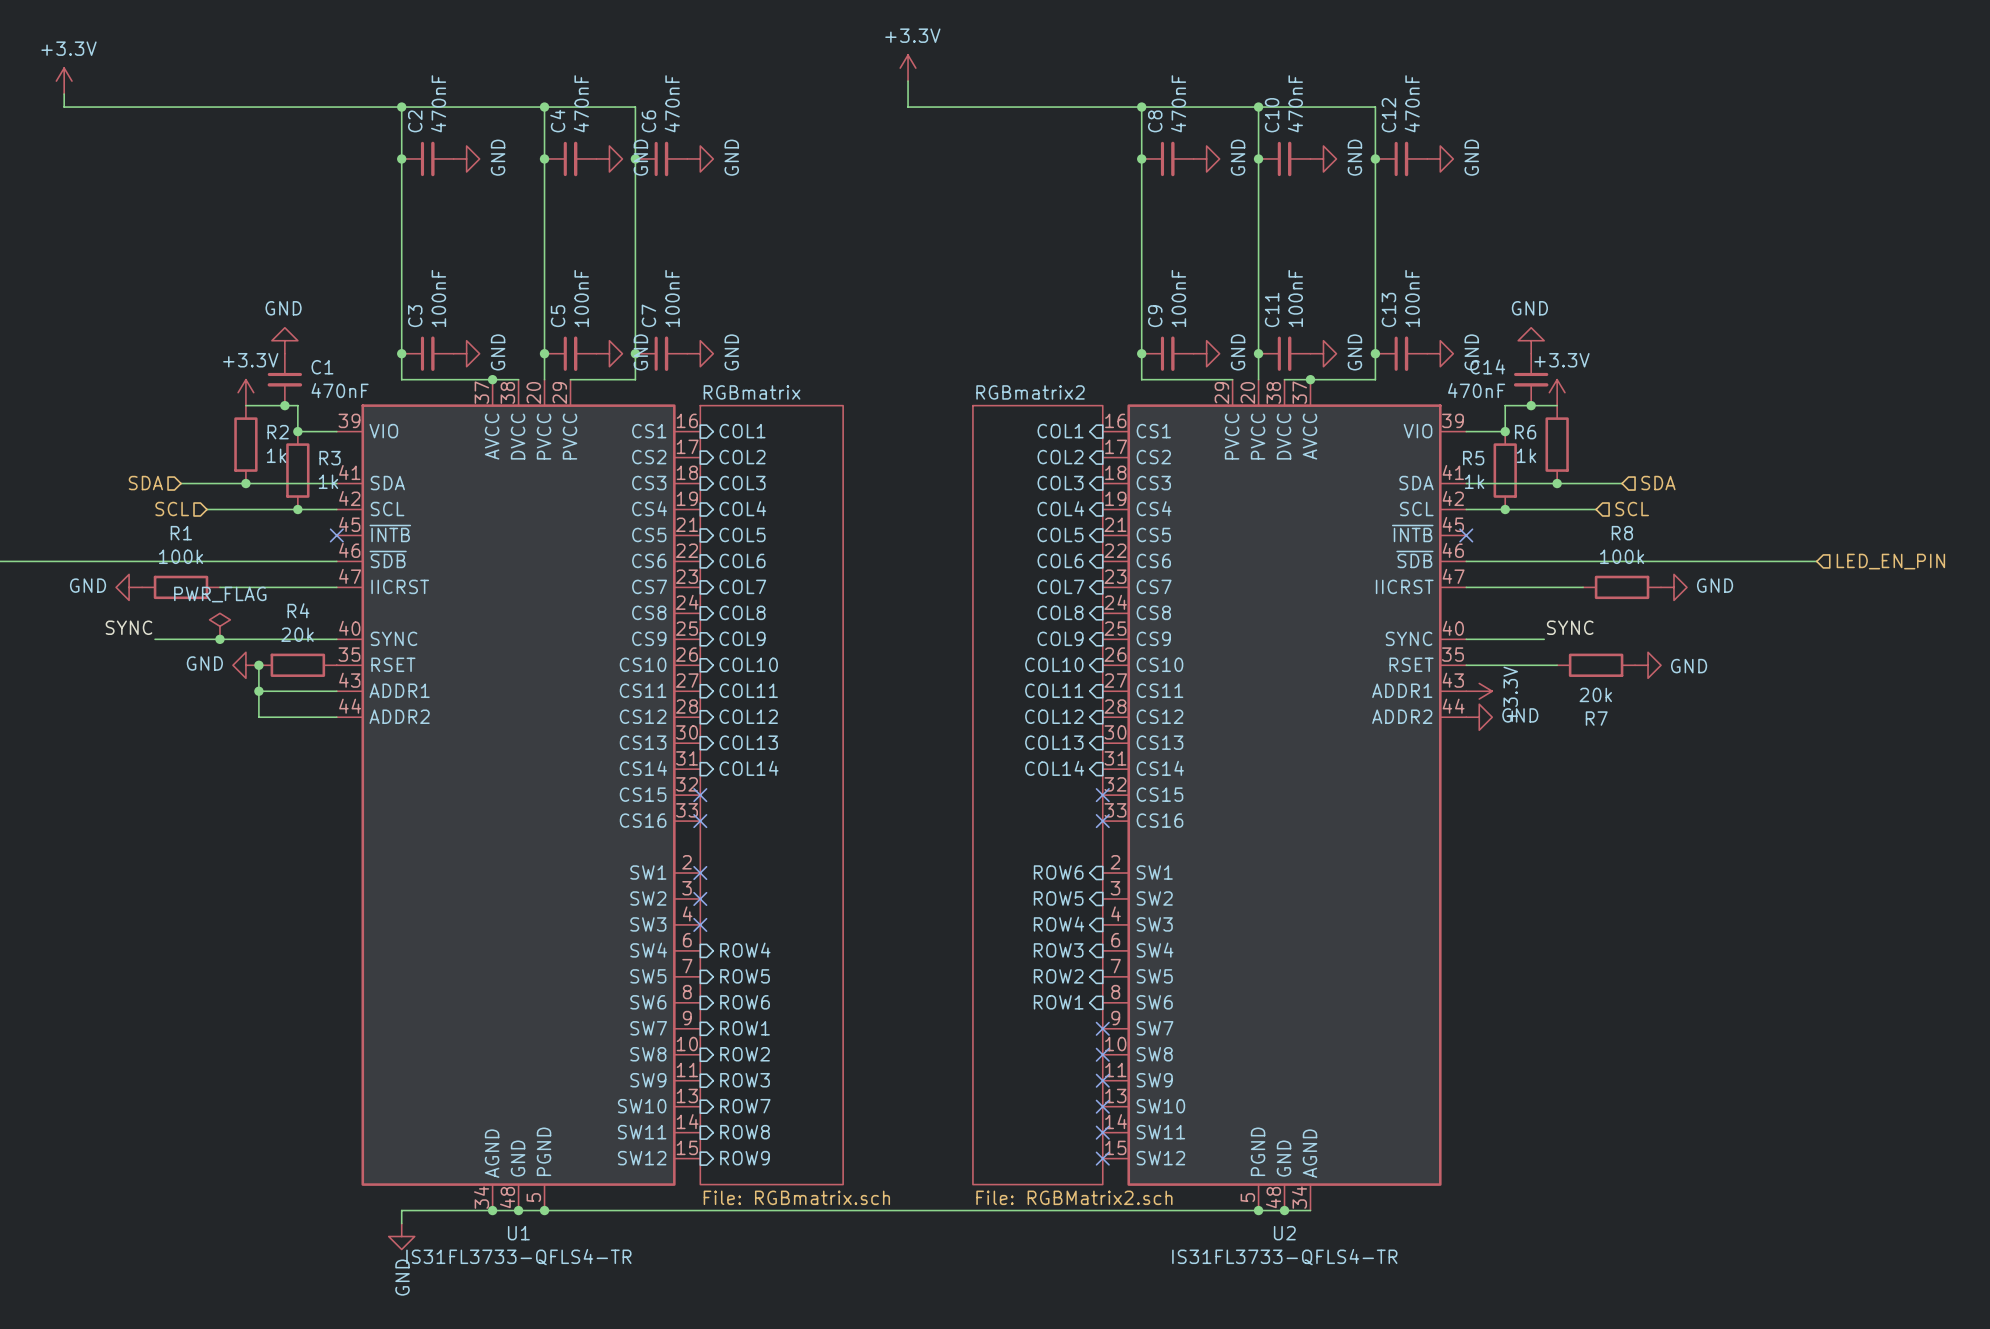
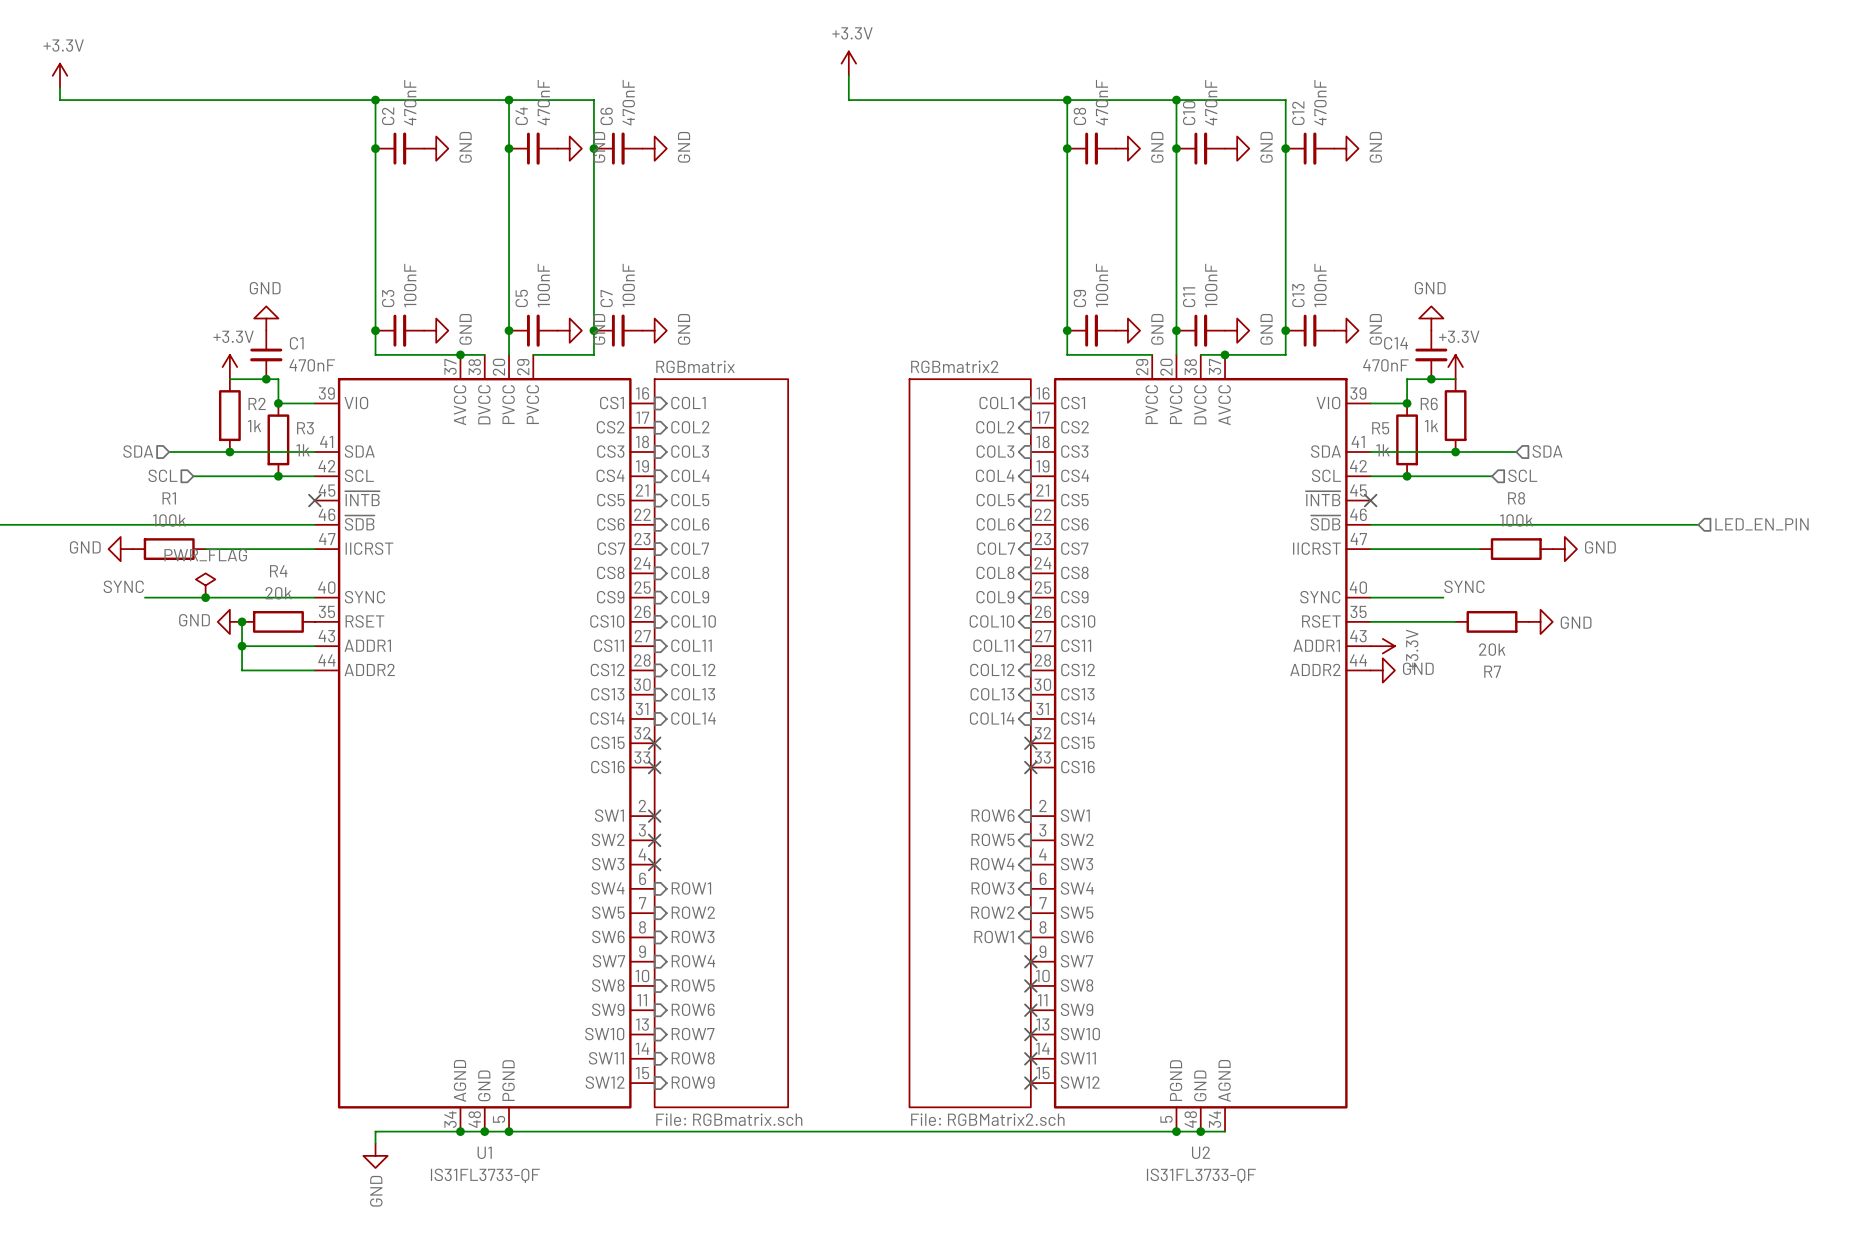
sheet pin: ROW4 (745, 950) -> ROW1 (691, 888)
sheet pin: ROW5 (745, 976) -> ROW2 (693, 912)
sheet pin: ROW6 (745, 1002) -> ROW3 (693, 936)
sheet pin: ROW1 (745, 1028) -> ROW4 (693, 961)
sheet pin: ROW2 (745, 1054) -> ROW5 (693, 985)
sheet pin: ROW3 (745, 1080) -> ROW6 (693, 1009)
U1 value: IS31FL3733-QFLS4-TR (518, 1257) -> IS31FL3733-QF (485, 1175)
U2 value: IS31FL3733-QFLS4-TR (1284, 1257) -> IS31FL3733-QF (1201, 1175)

